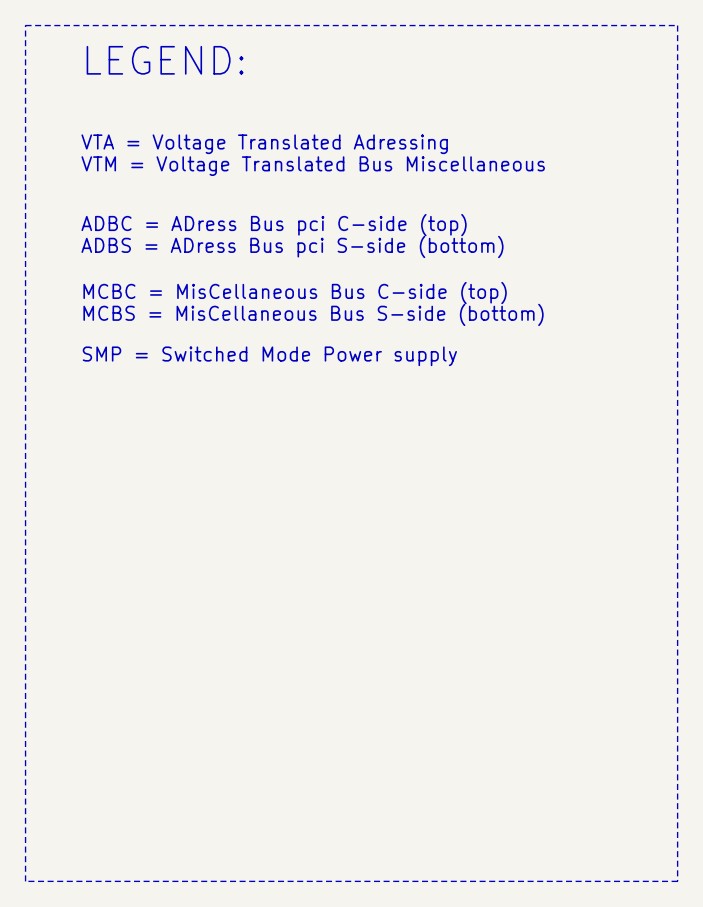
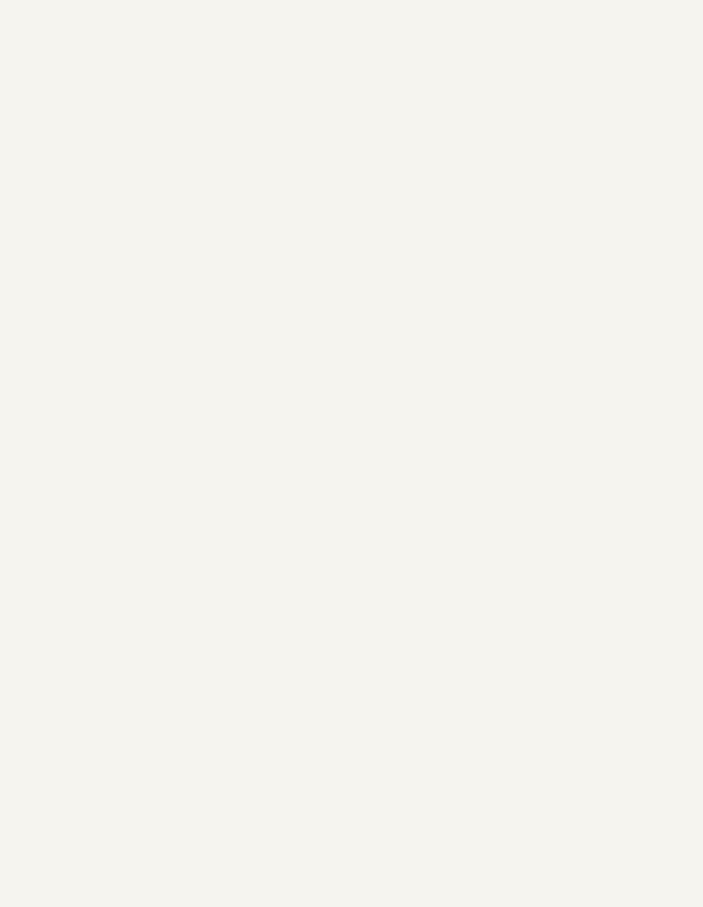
line: (25, 25) (677, 25) (677, 881) (25, 881) (25, 25) -> none
text: LEGEND: (165, 60) -> none
text: VTA = Voltage Translated Adressing (264, 144) -> none
text: VTM = Voltage Translated Bus Miscellaneous (313, 166) -> none
text: ADBC = ADress Bus pci C-side (top) (274, 225) -> none
text: ADBS = ADress Bus pci S-side (bottom) (292, 246) -> none
text: MCBC = MisCellaneous Bus C-side (top) (295, 293) -> none
text: MCBS = MisCellaneous Bus S-side (bottom) (313, 314) -> none
text: SMP = Switched Mode Power supply (269, 356) -> none

